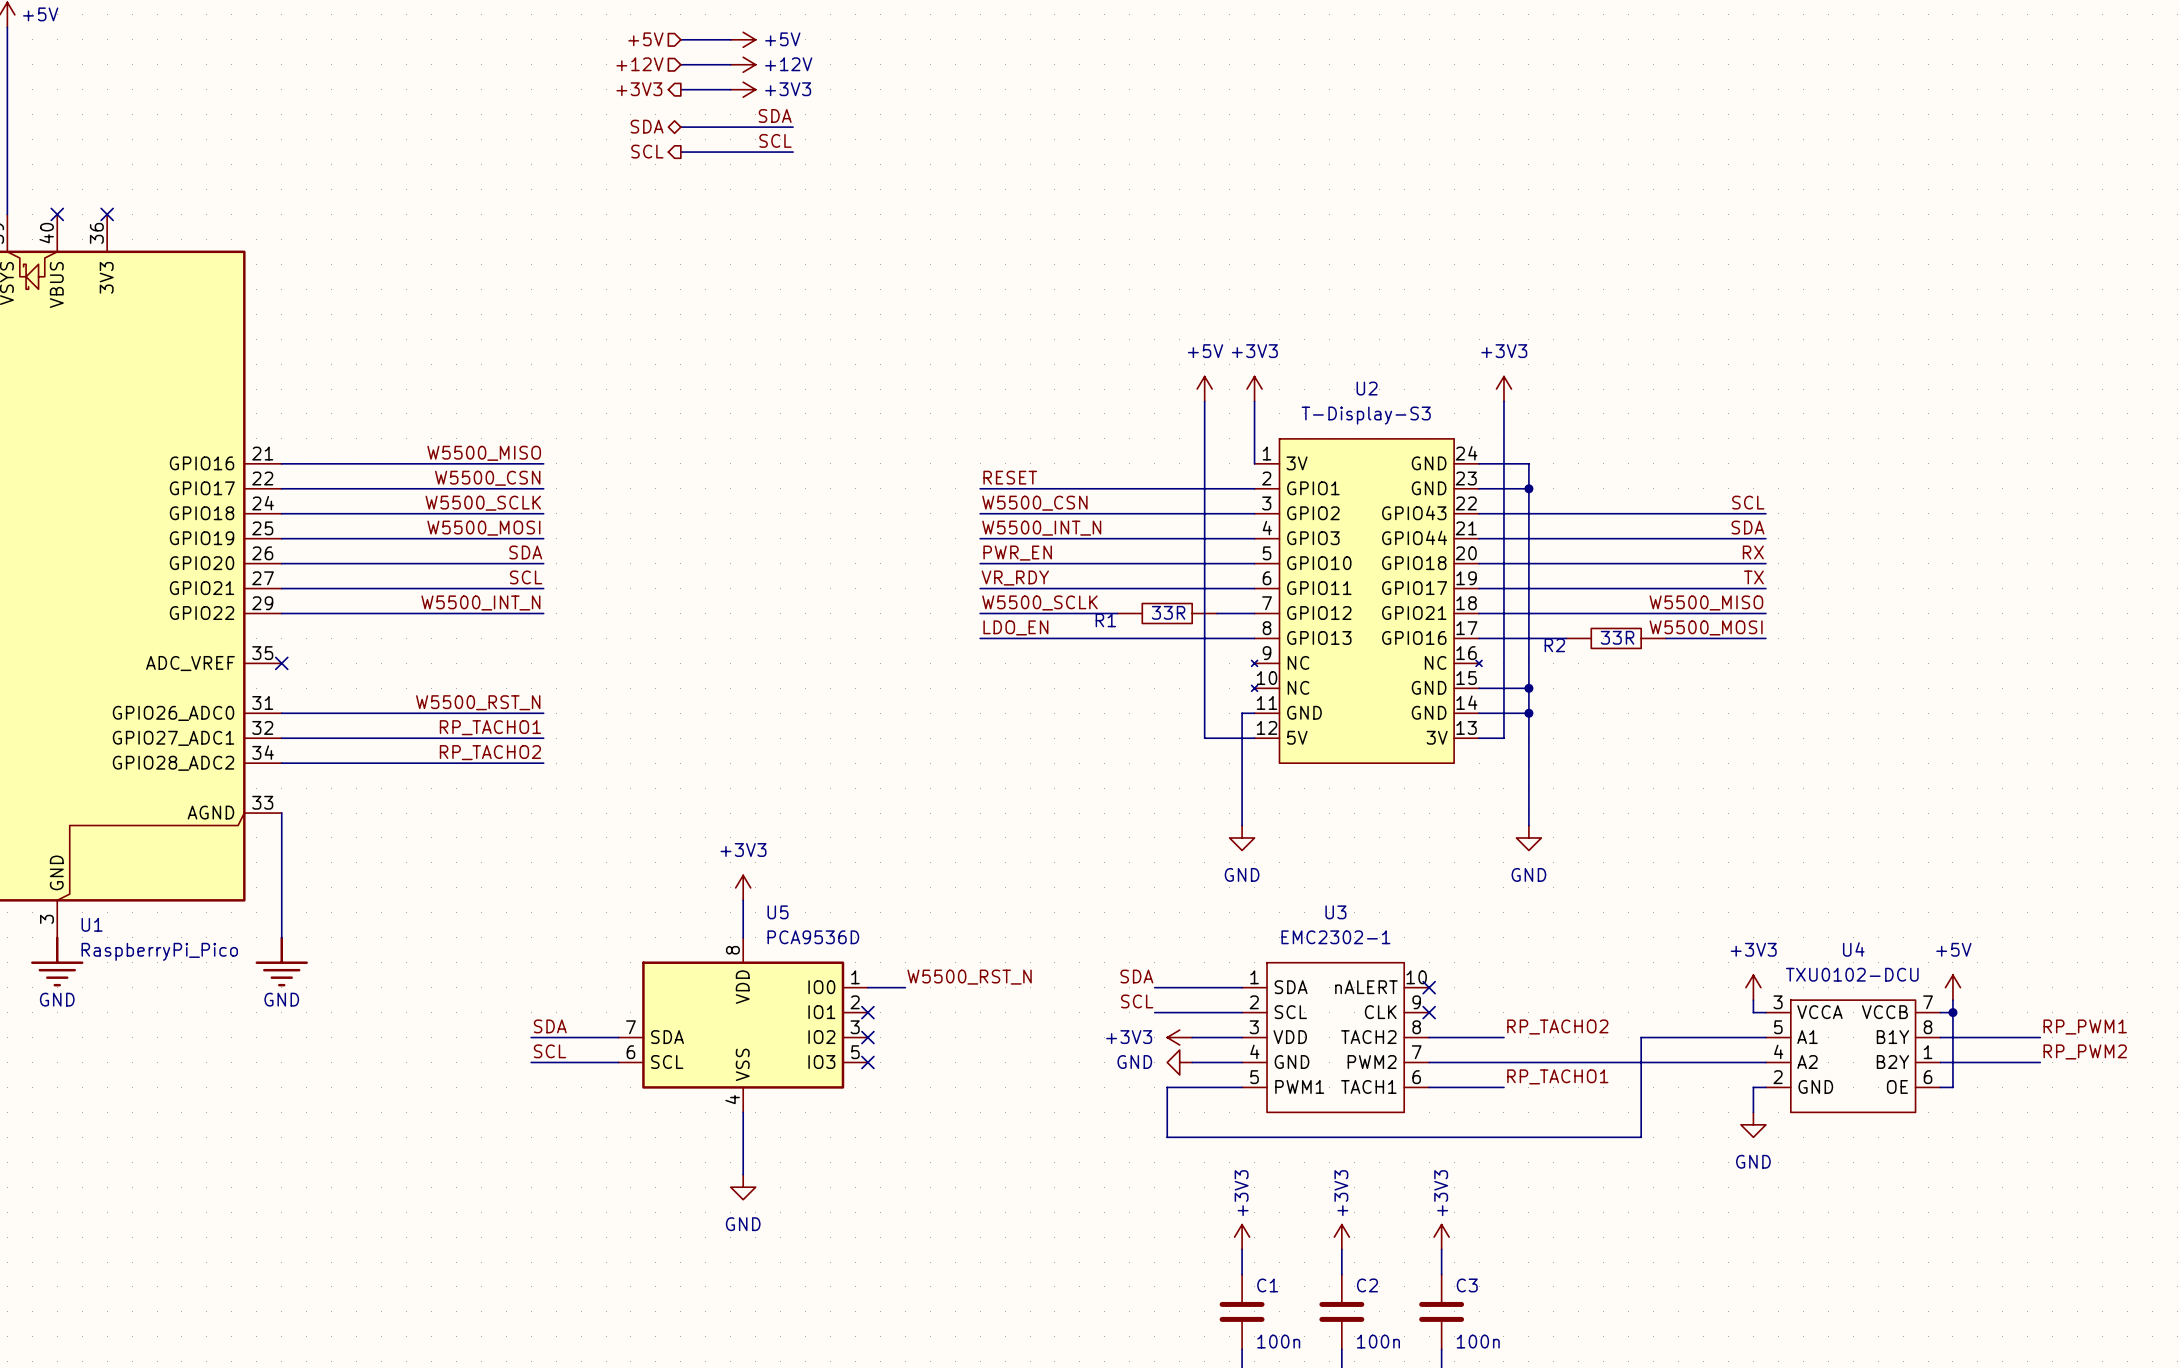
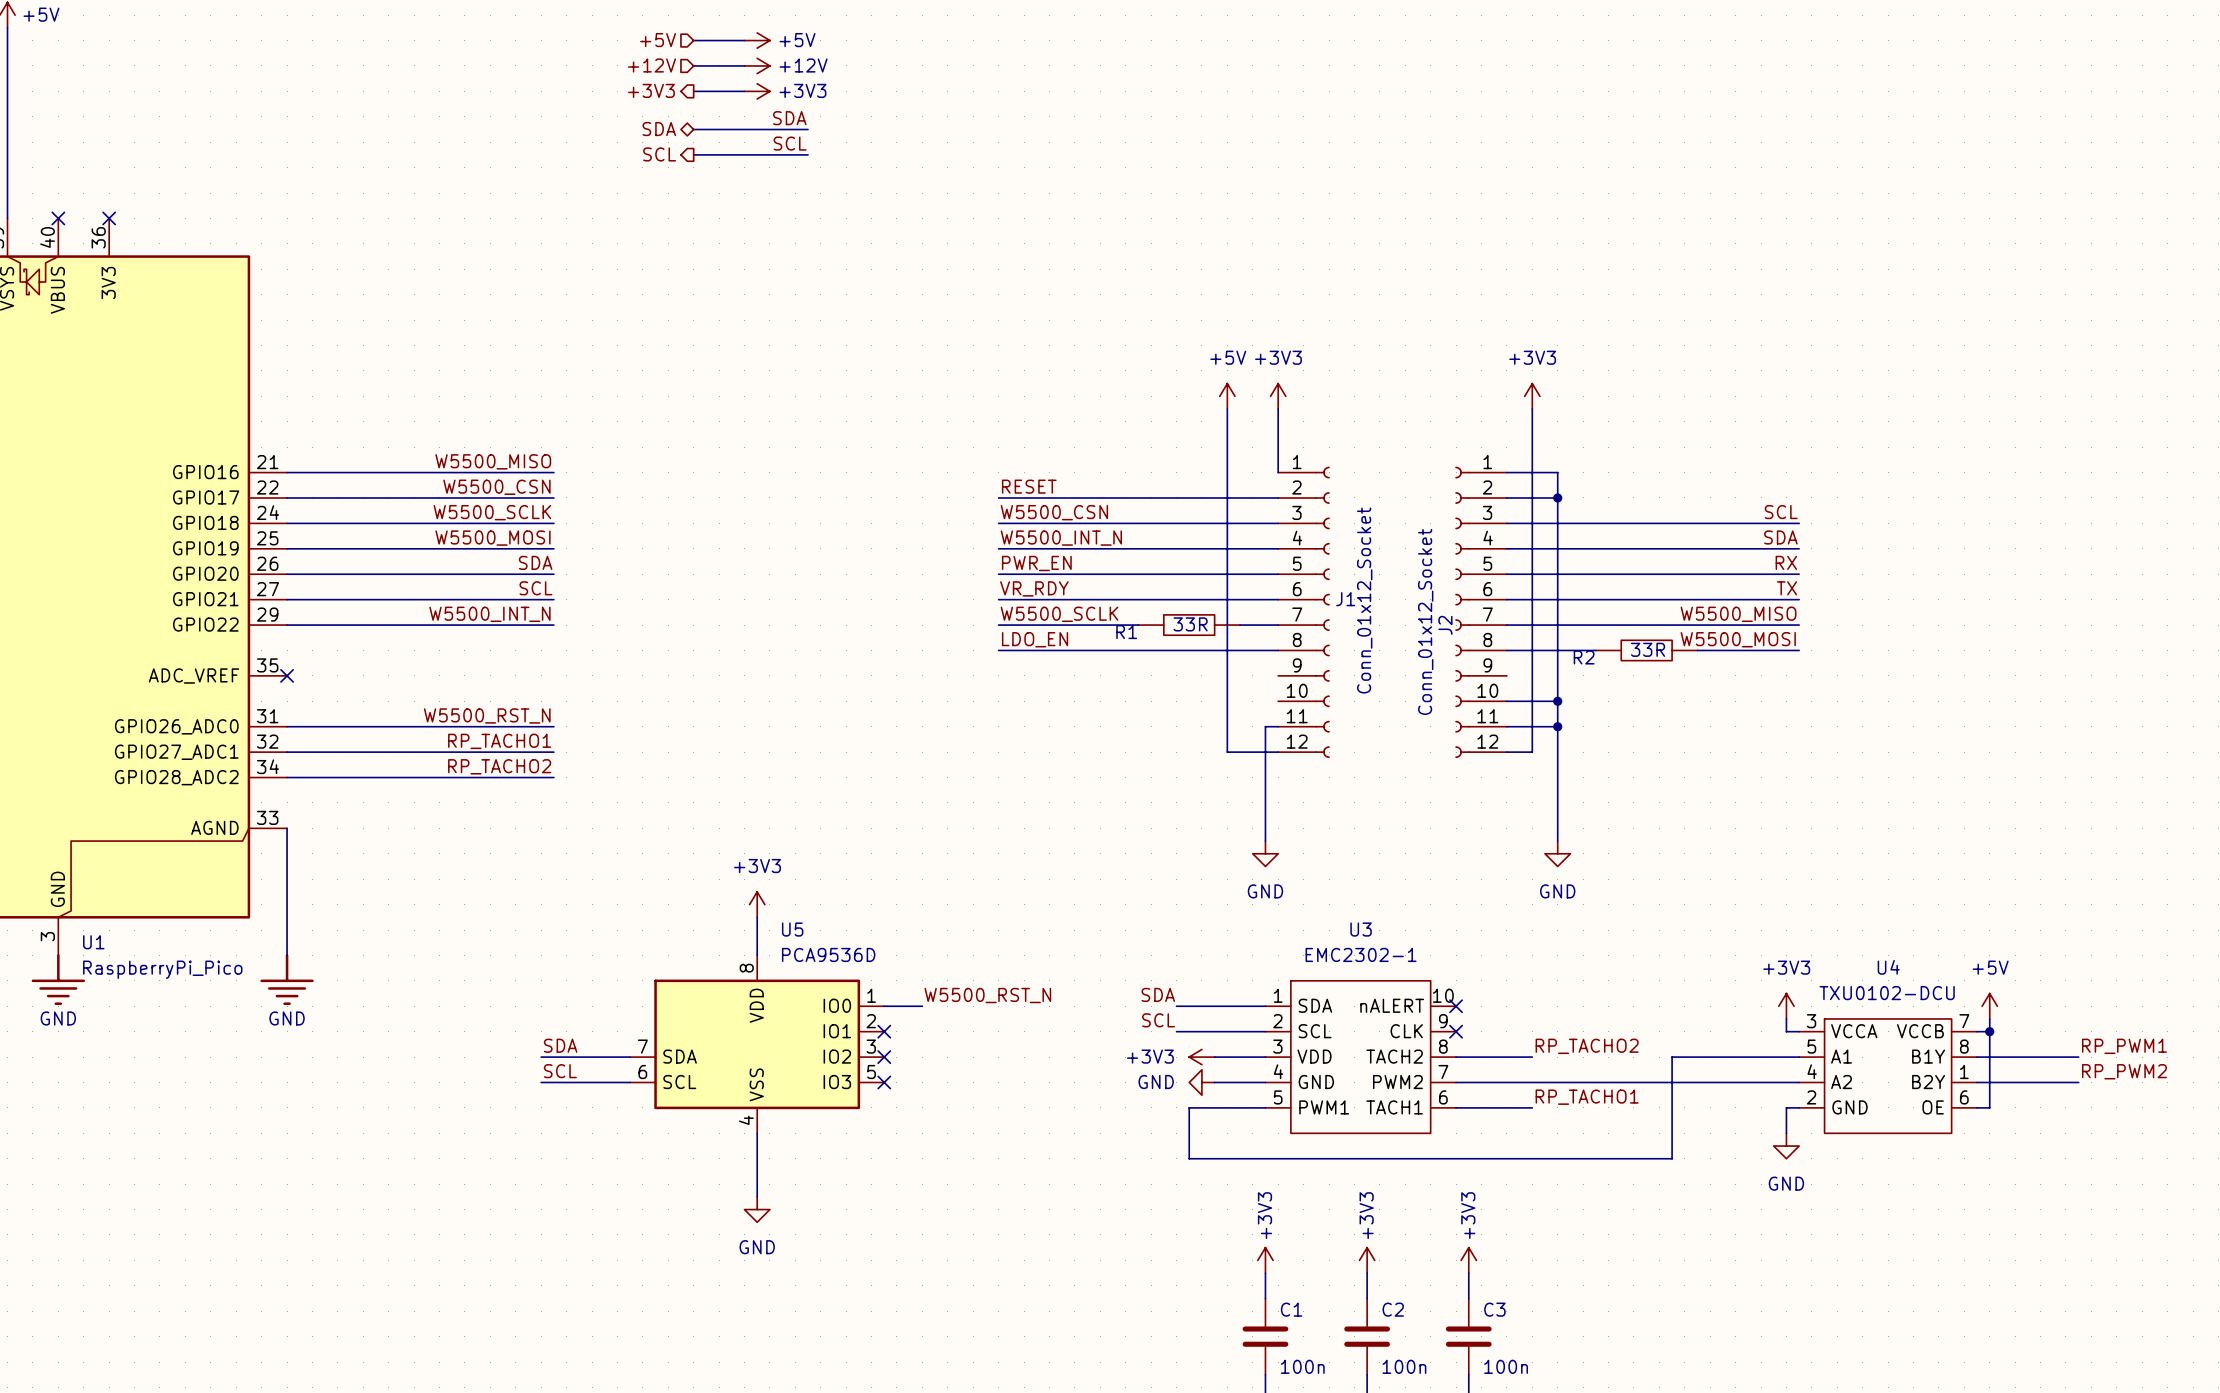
J1: none -> Conn_01x12_Socket (1303, 612)
U2: T-Display-S3 (1366, 601) -> none
J2: none -> Conn_01x12_Socket (1481, 612)

